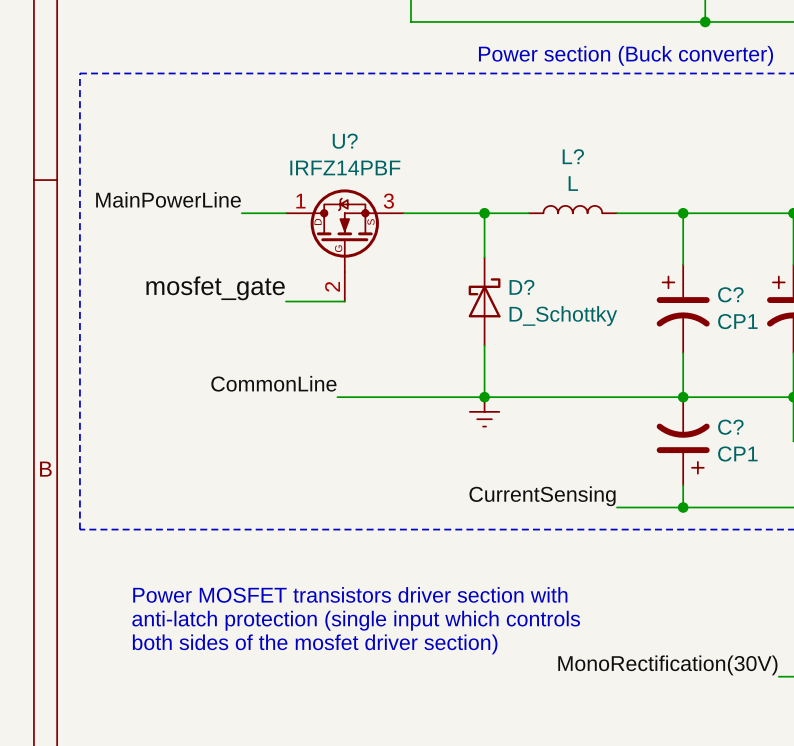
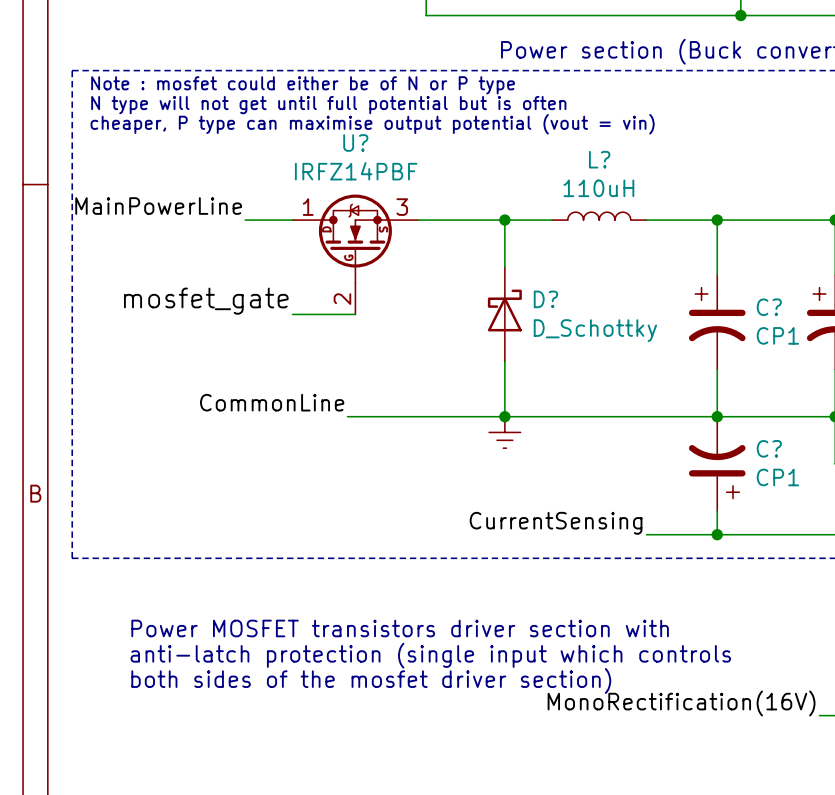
text: none -> Note : mosfet could either be of N or P type (303, 85)
text: none -> N type will not get until full potential but is often (328, 105)
text: none -> cheaper, P type can maximise output potential (vout = vin) (372, 124)
L? value: L (573, 183) -> 110uH (598, 188)
label: MonoRectification(30V) (667, 665) -> MonoRectification(16V) (681, 703)

